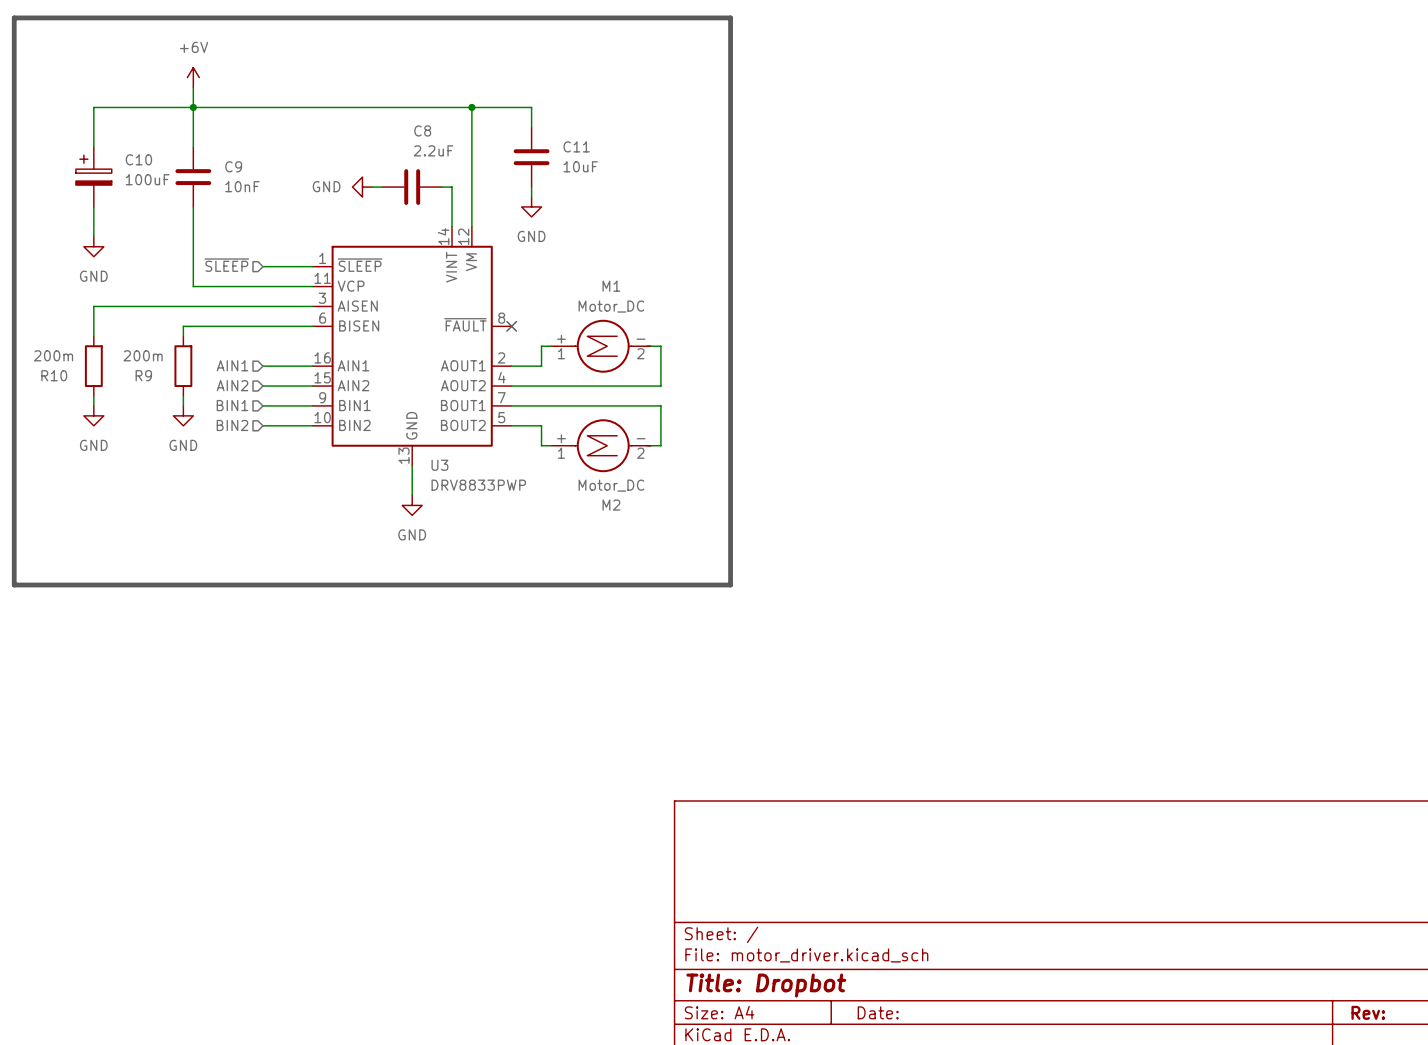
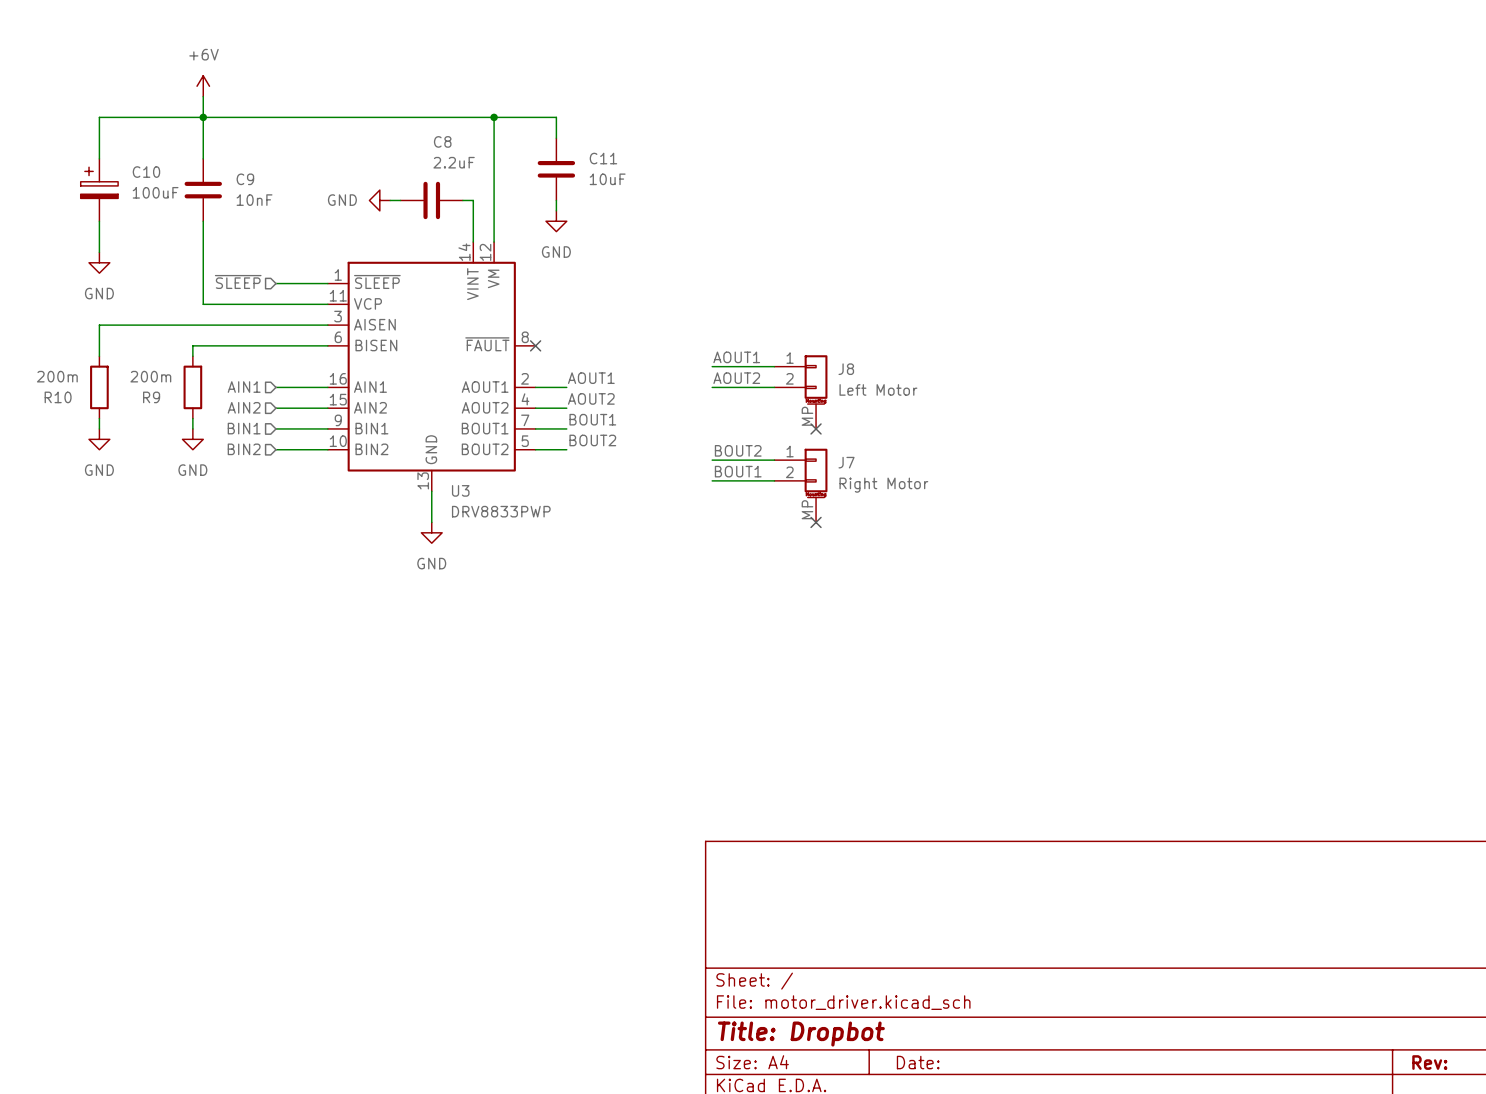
line: (14, 17) (730, 17) (730, 585) (14, 585) (14, 17) -> none
label: none -> AOUT1 (736, 357)
wire: (551, 346) (541, 346) (541, 366) -> none
M1: Motor_DC (601, 346) -> none
wire: (650, 346) (660, 346) (660, 386) (541, 386) -> none
wire: none -> (712, 366) (774, 366)
label: none -> AOUT1 (591, 378)
label: none -> AOUT2 (736, 378)
wire: none -> (712, 387) (774, 387)
J8: none -> Left Motor (800, 392)
label: none -> AOUT2 (591, 398)
label: none -> BOUT1 (592, 419)
wire: (541, 405) (660, 405) (660, 445) (650, 445) -> none
no-connect mark: none -> (816, 428)
label: none -> BOUT2 (592, 440)
wire: (541, 425) (541, 445) (551, 445) -> none
label: none -> BOUT2 (738, 450)
wire: none -> (712, 460) (774, 460)
M2: Motor_DC (601, 445) -> none
label: none -> BOUT1 (738, 471)
wire: none -> (712, 480) (774, 480)
J7: none -> Right Motor (800, 485)
no-connect mark: none -> (816, 522)

